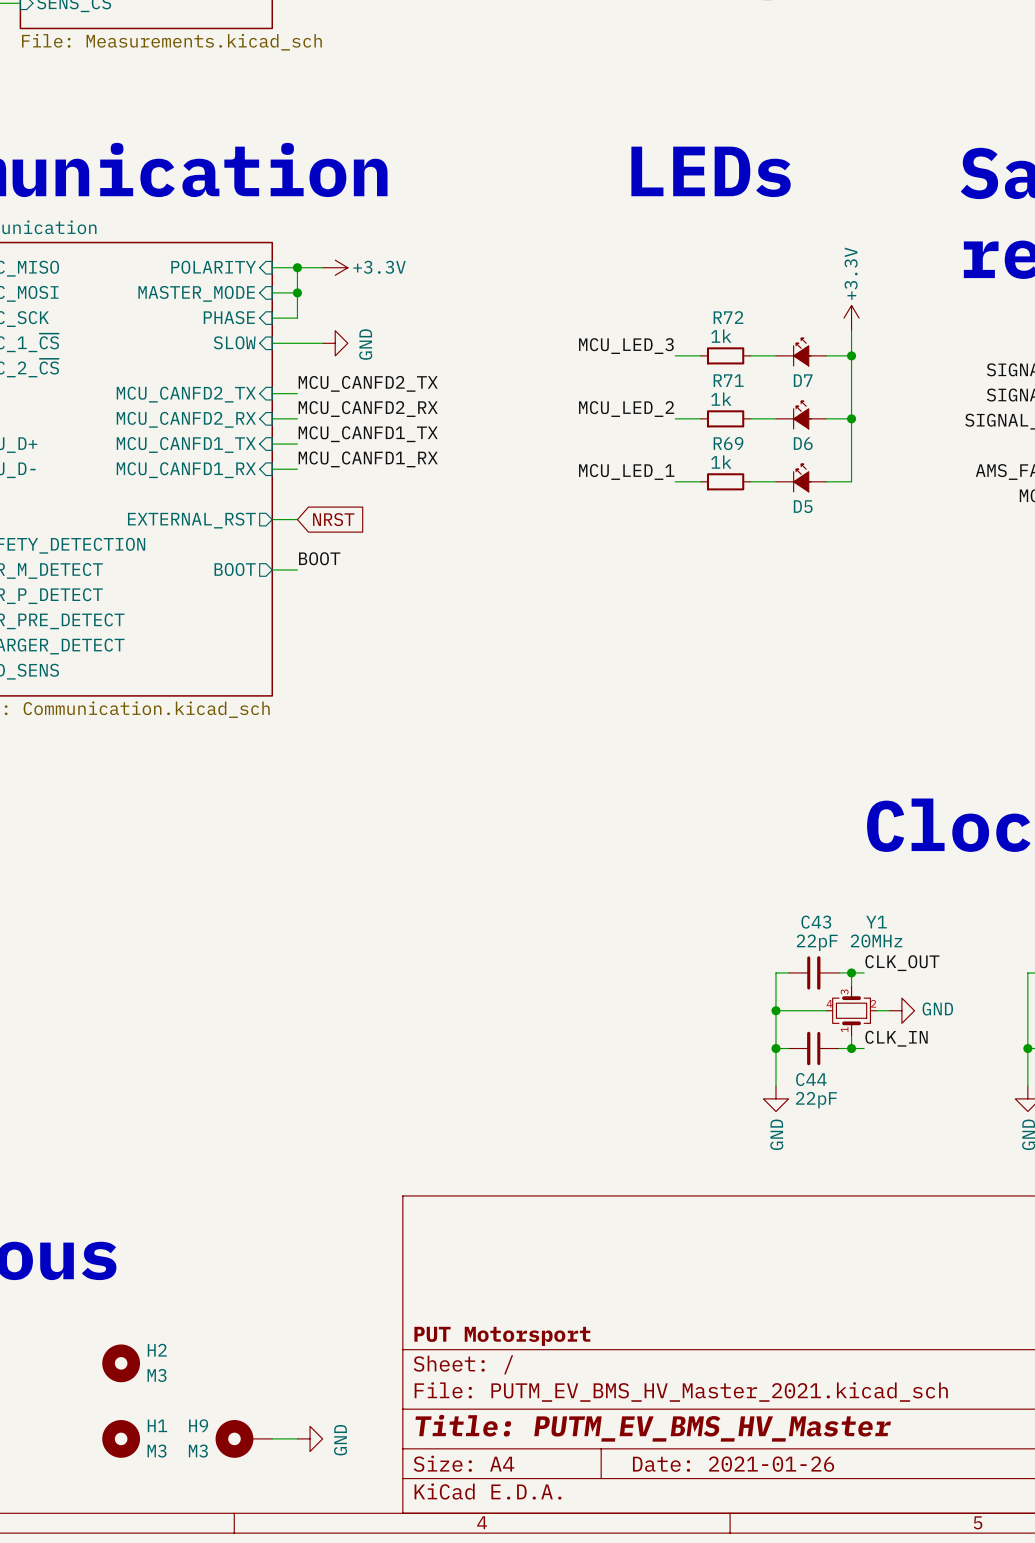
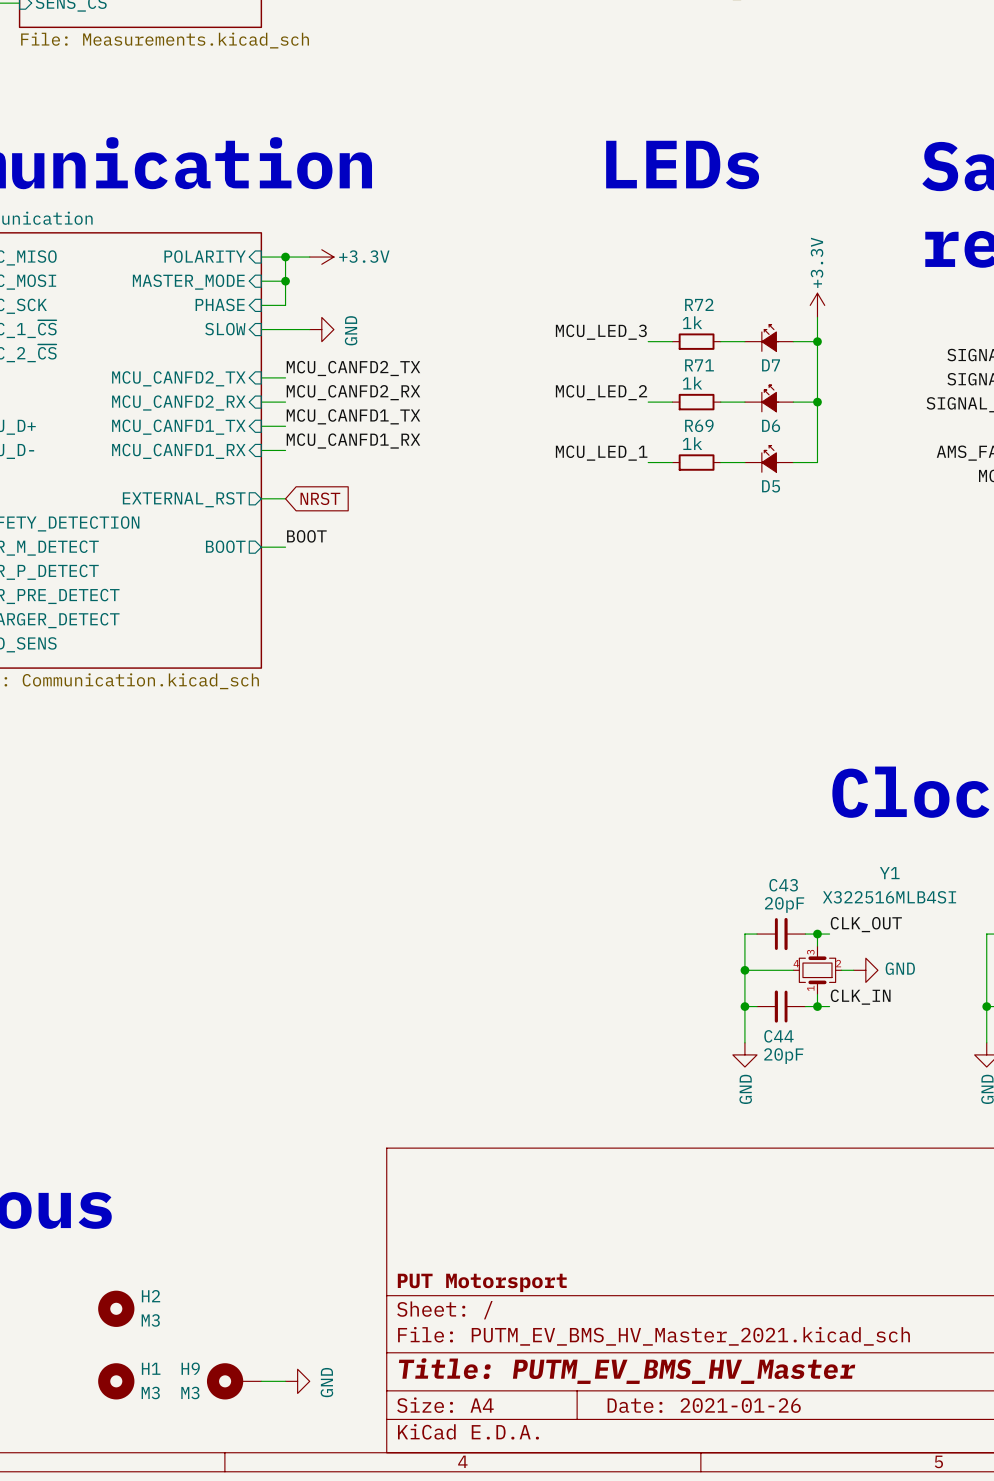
Y1 name position: Y1 (876, 922) -> Y1 (889, 873)
Y1 value: 20MHz (876, 941) -> X322516MLB4SI (889, 897)
C43 value: 22pF (817, 942) -> 20pF (784, 904)
C44 value: 22pF (816, 1100) -> 20pF (783, 1056)

